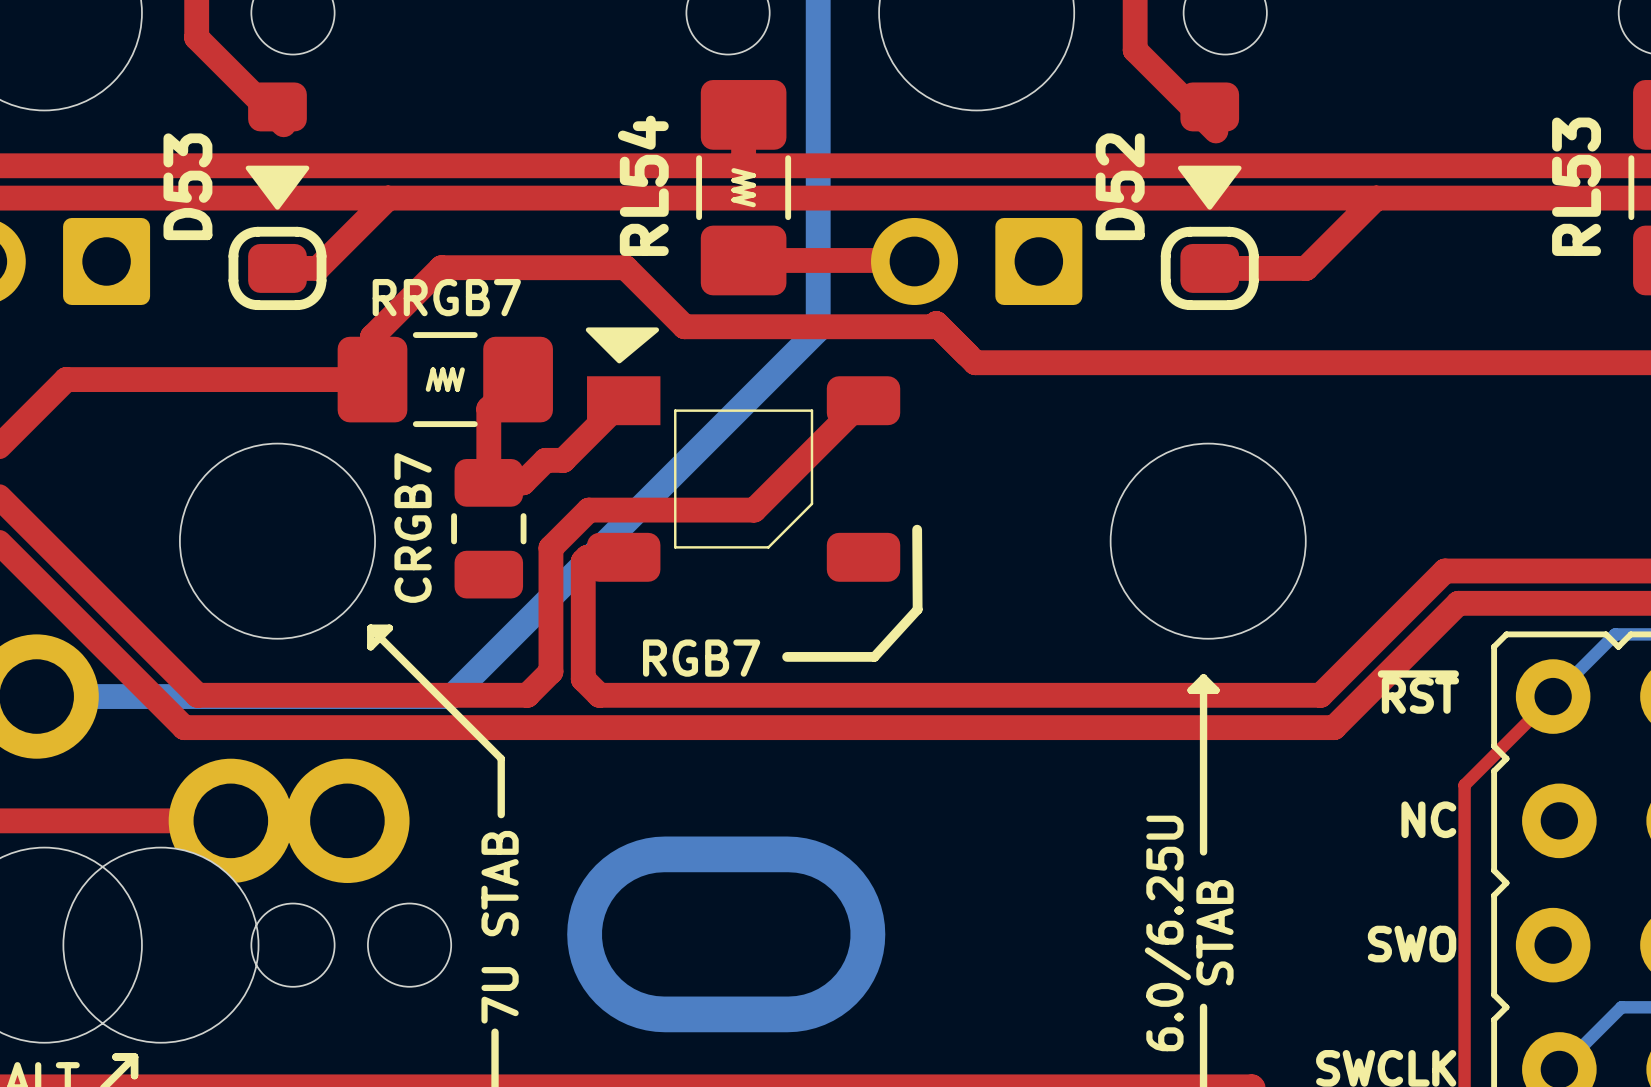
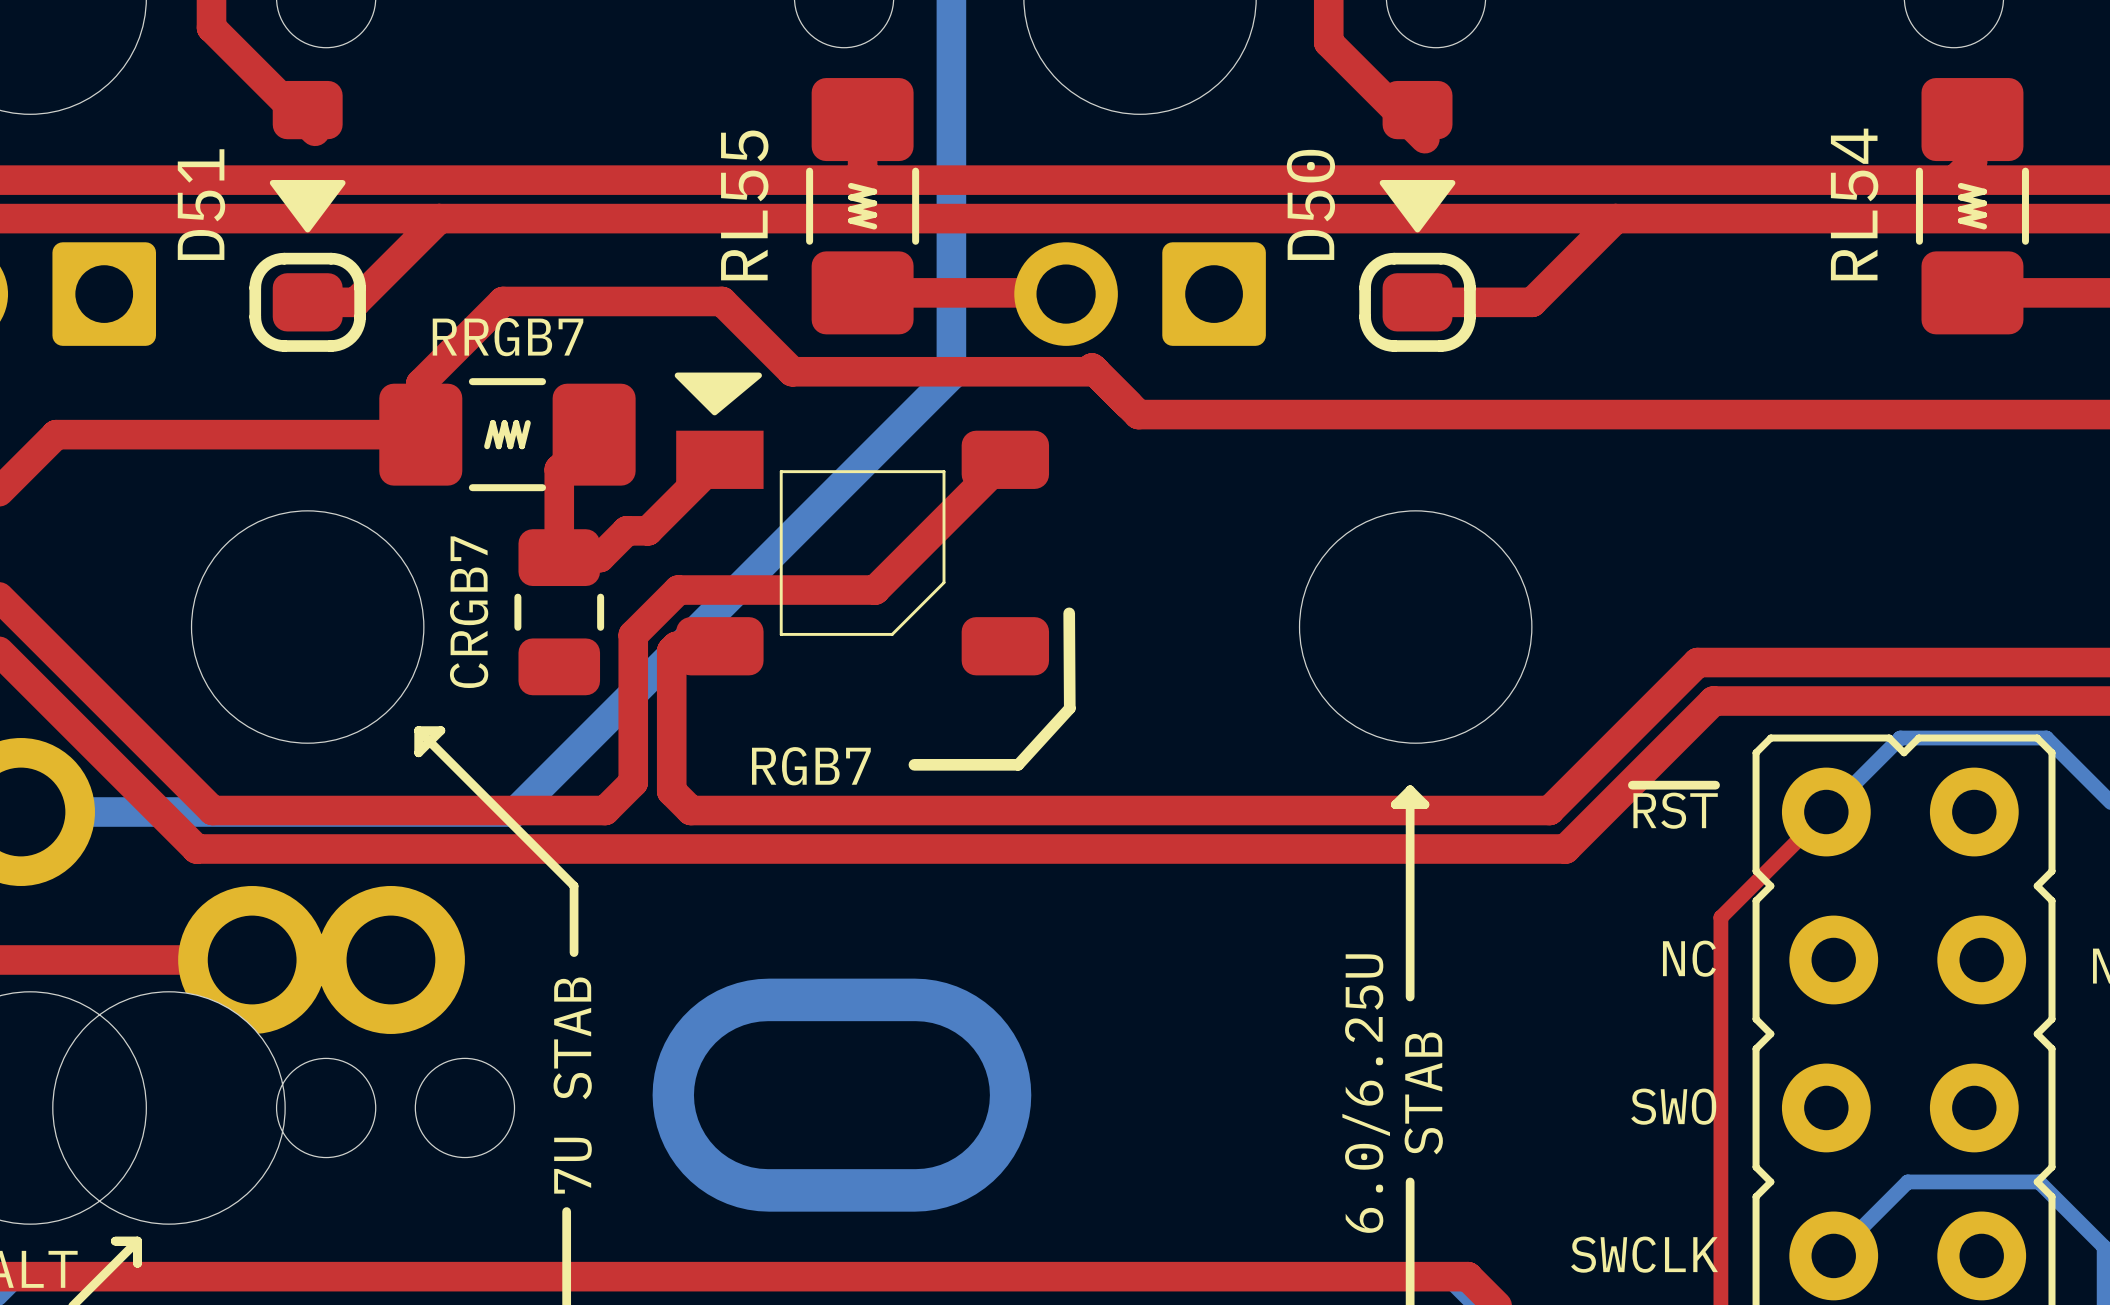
RL54 name: RL54 (643, 185) -> RL55 (744, 205)
D53 name: D53 (187, 186) -> D51 (201, 204)
D52 name: D52 (1120, 186) -> D50 (1310, 204)
RL53 name: RL53 (1576, 186) -> RL54 (1854, 204)

